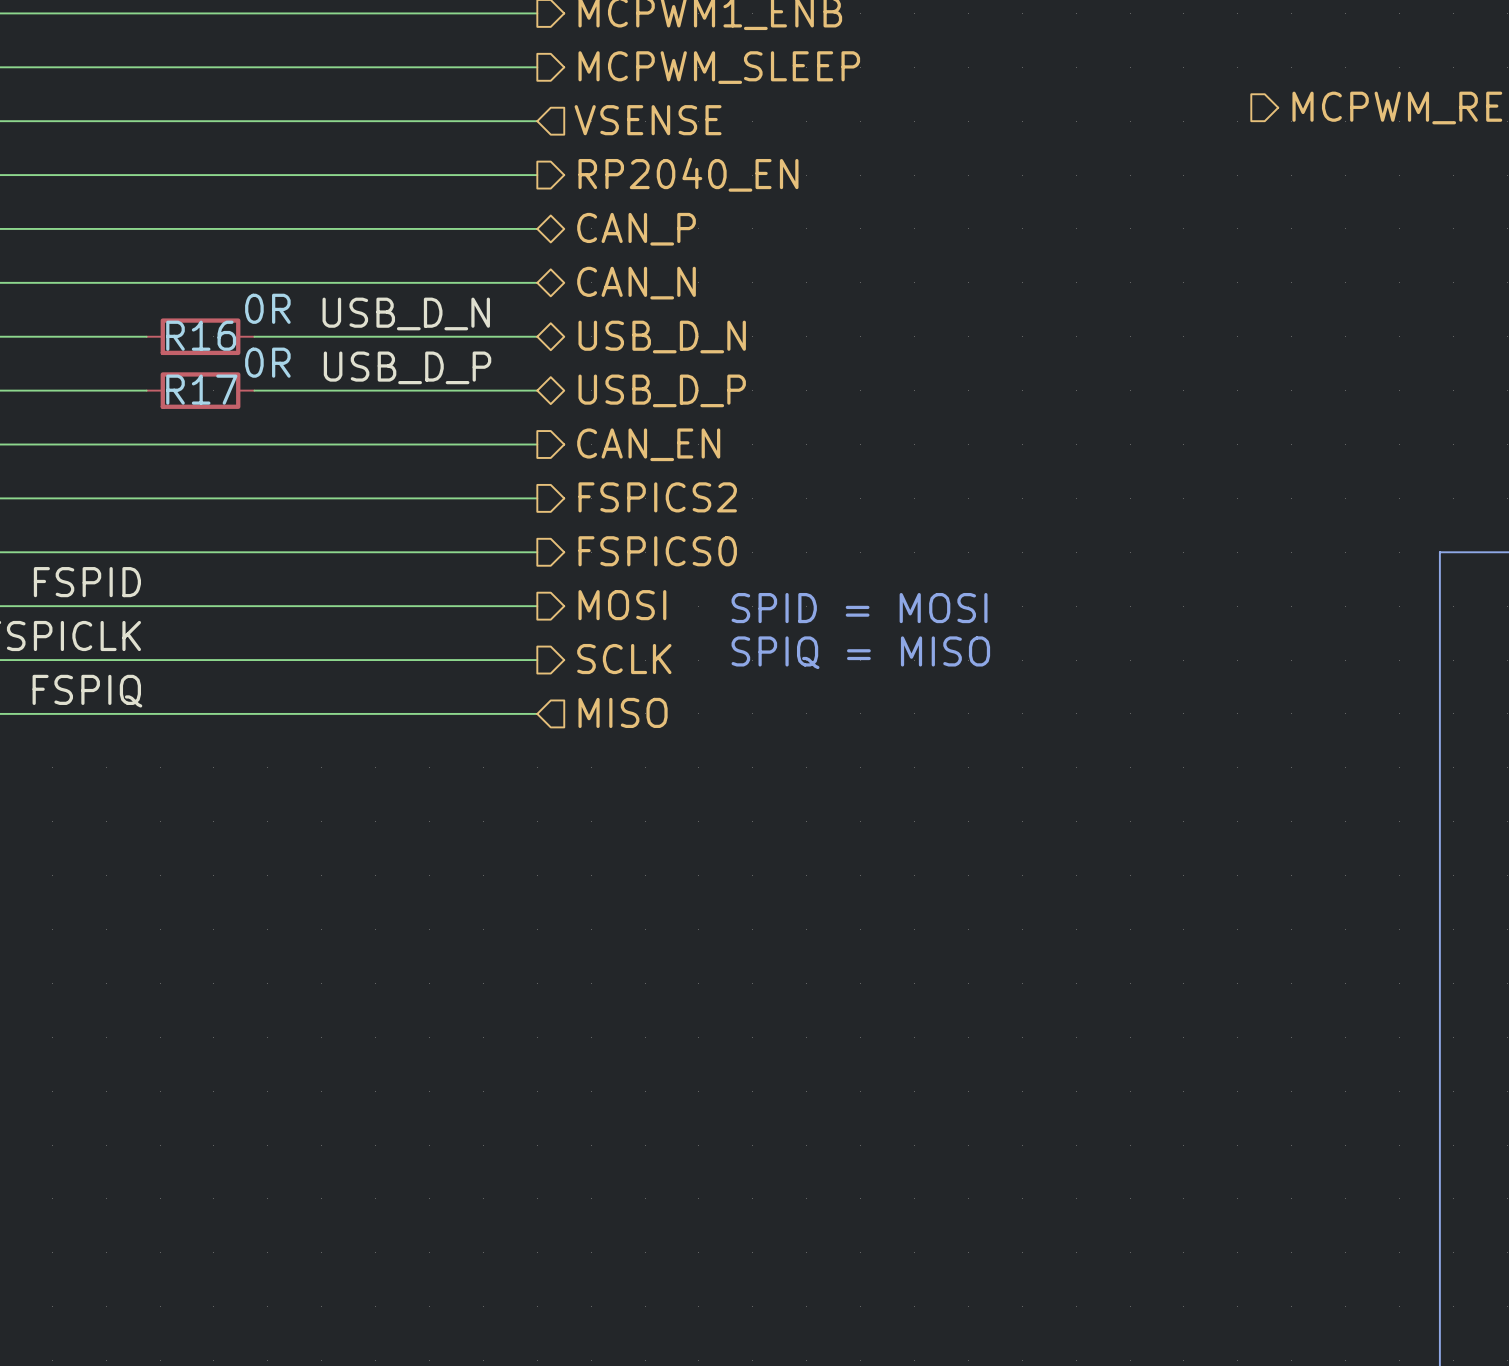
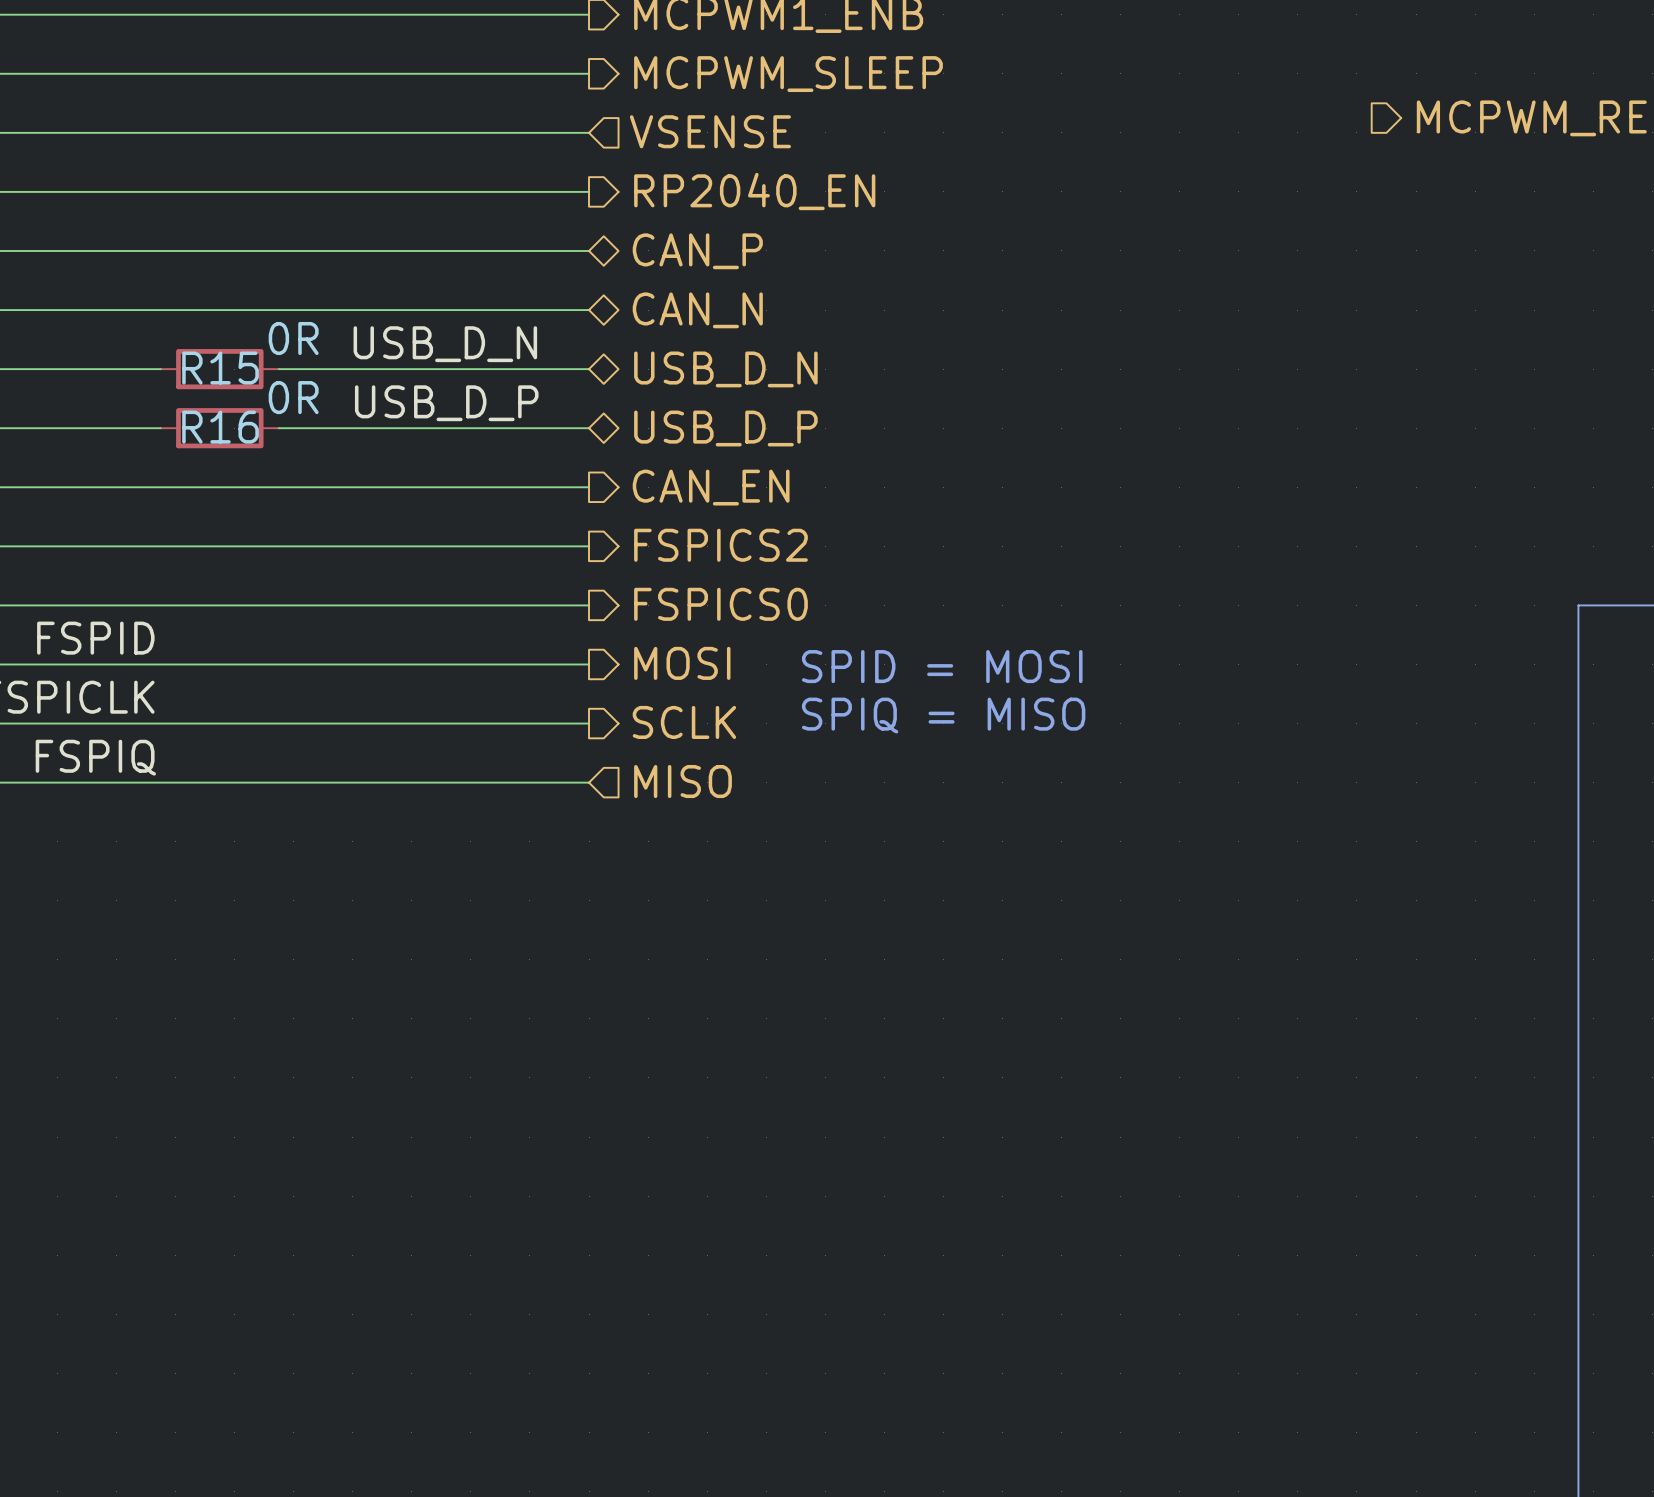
R16 name: R16 (201, 335) -> R15 (220, 368)
R17 name: R17 (201, 389) -> R16 (220, 427)

